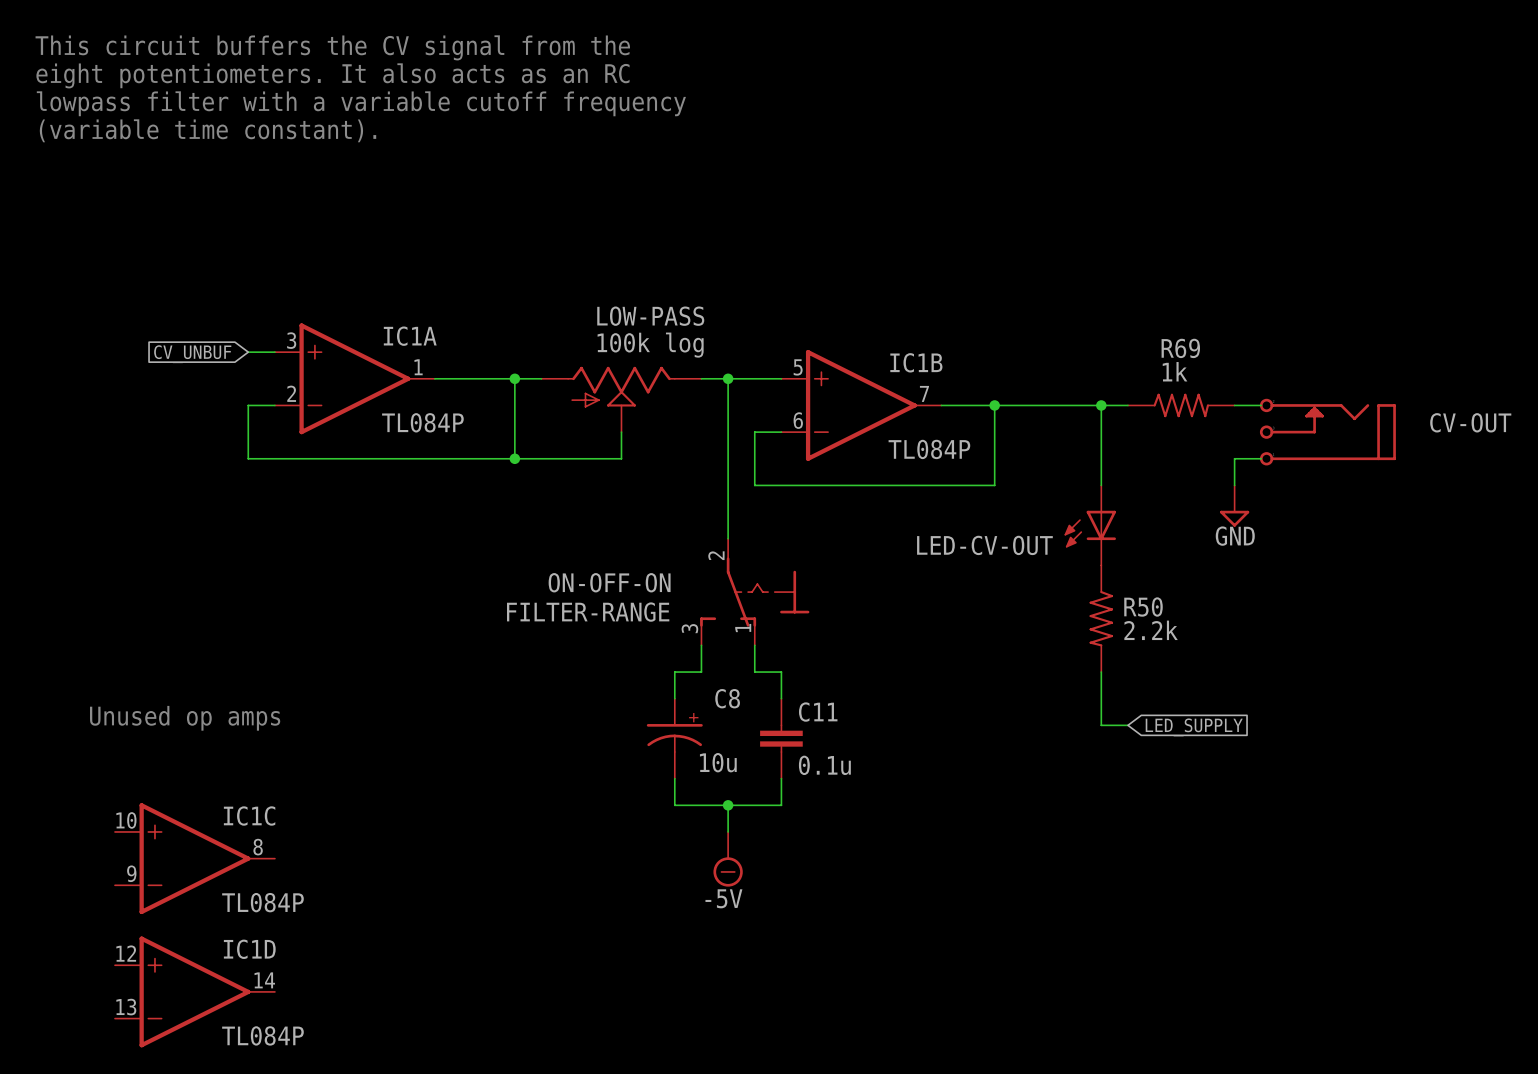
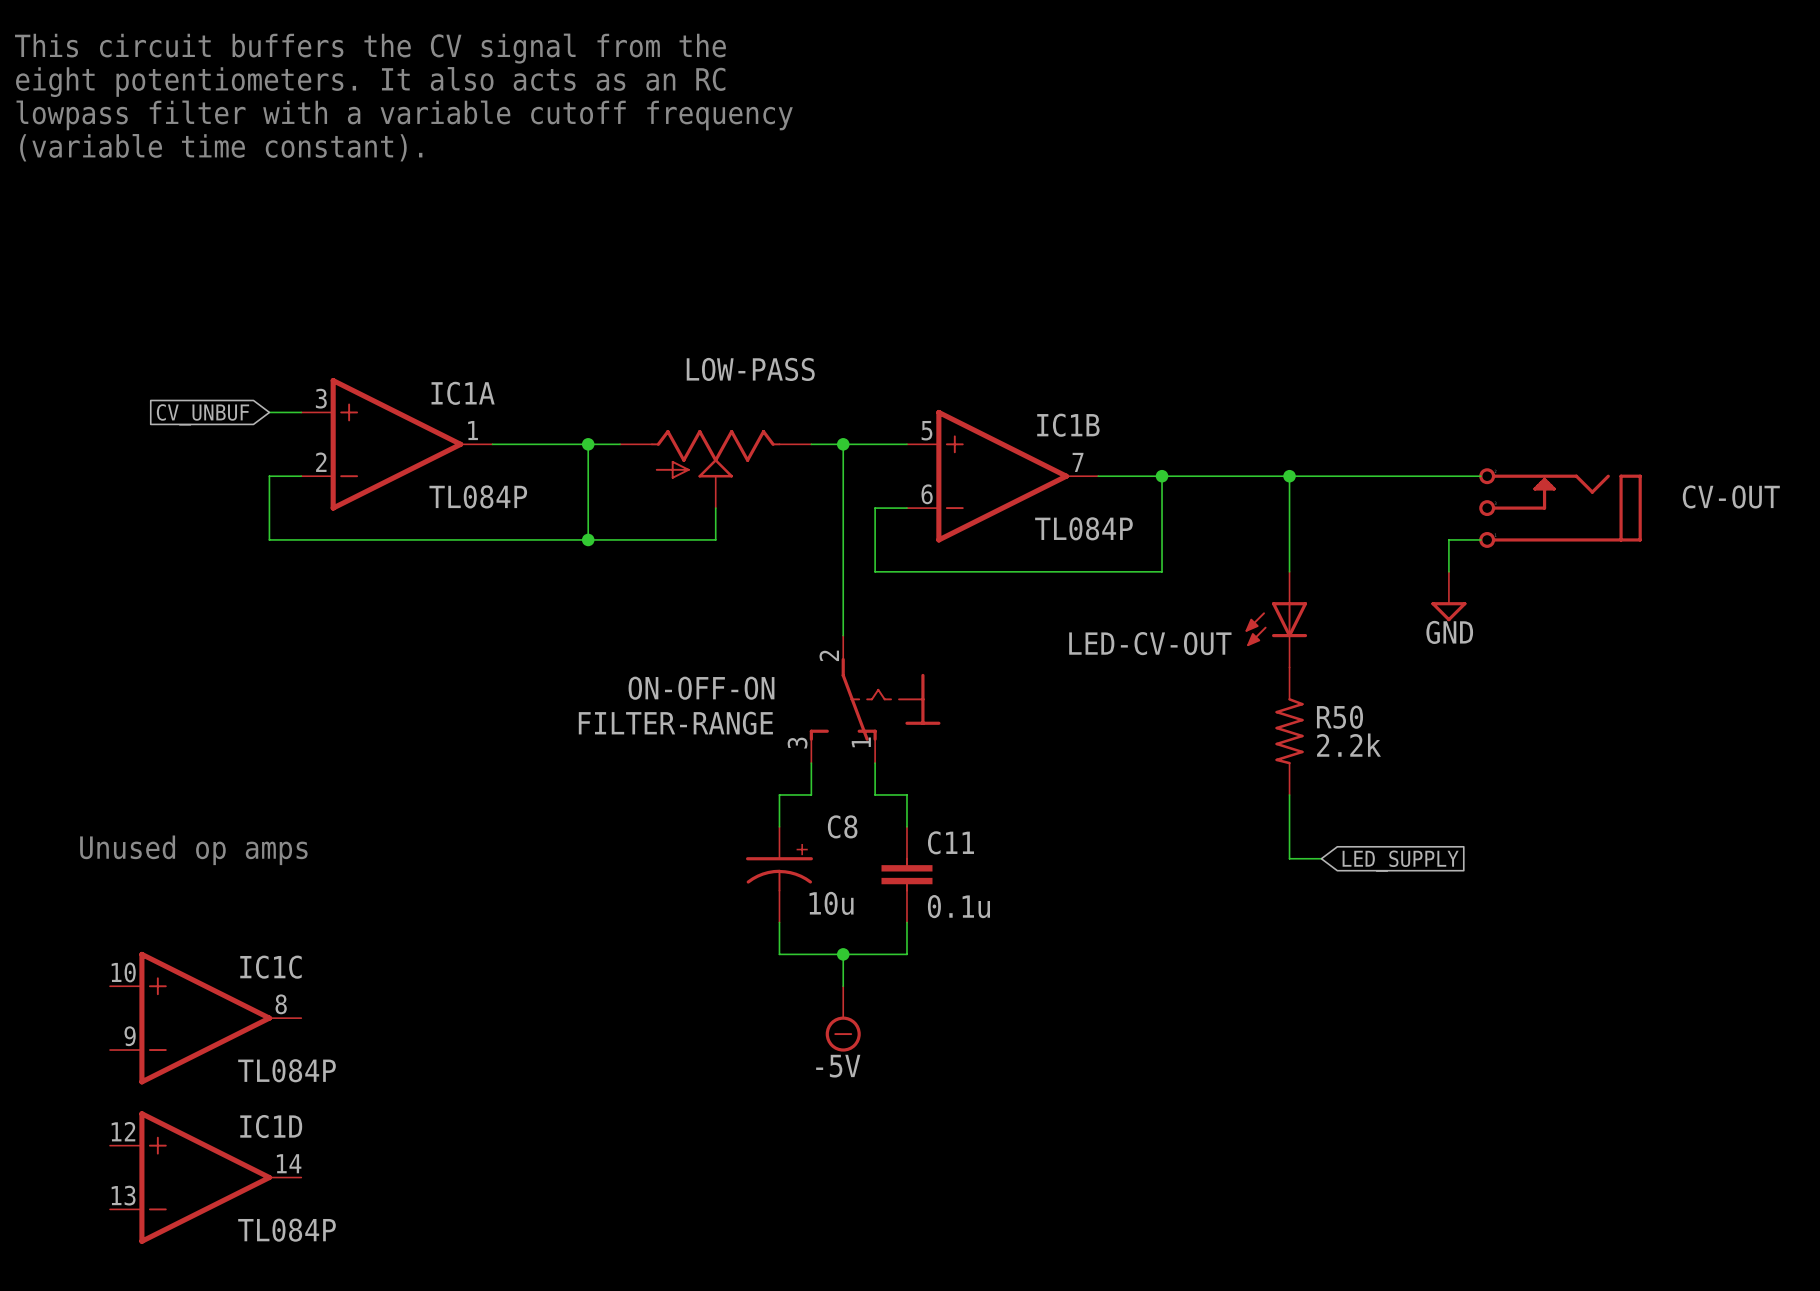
LOW-PASS value: 100k log (650, 345) -> none
R69: 1k (1181, 405) -> none

